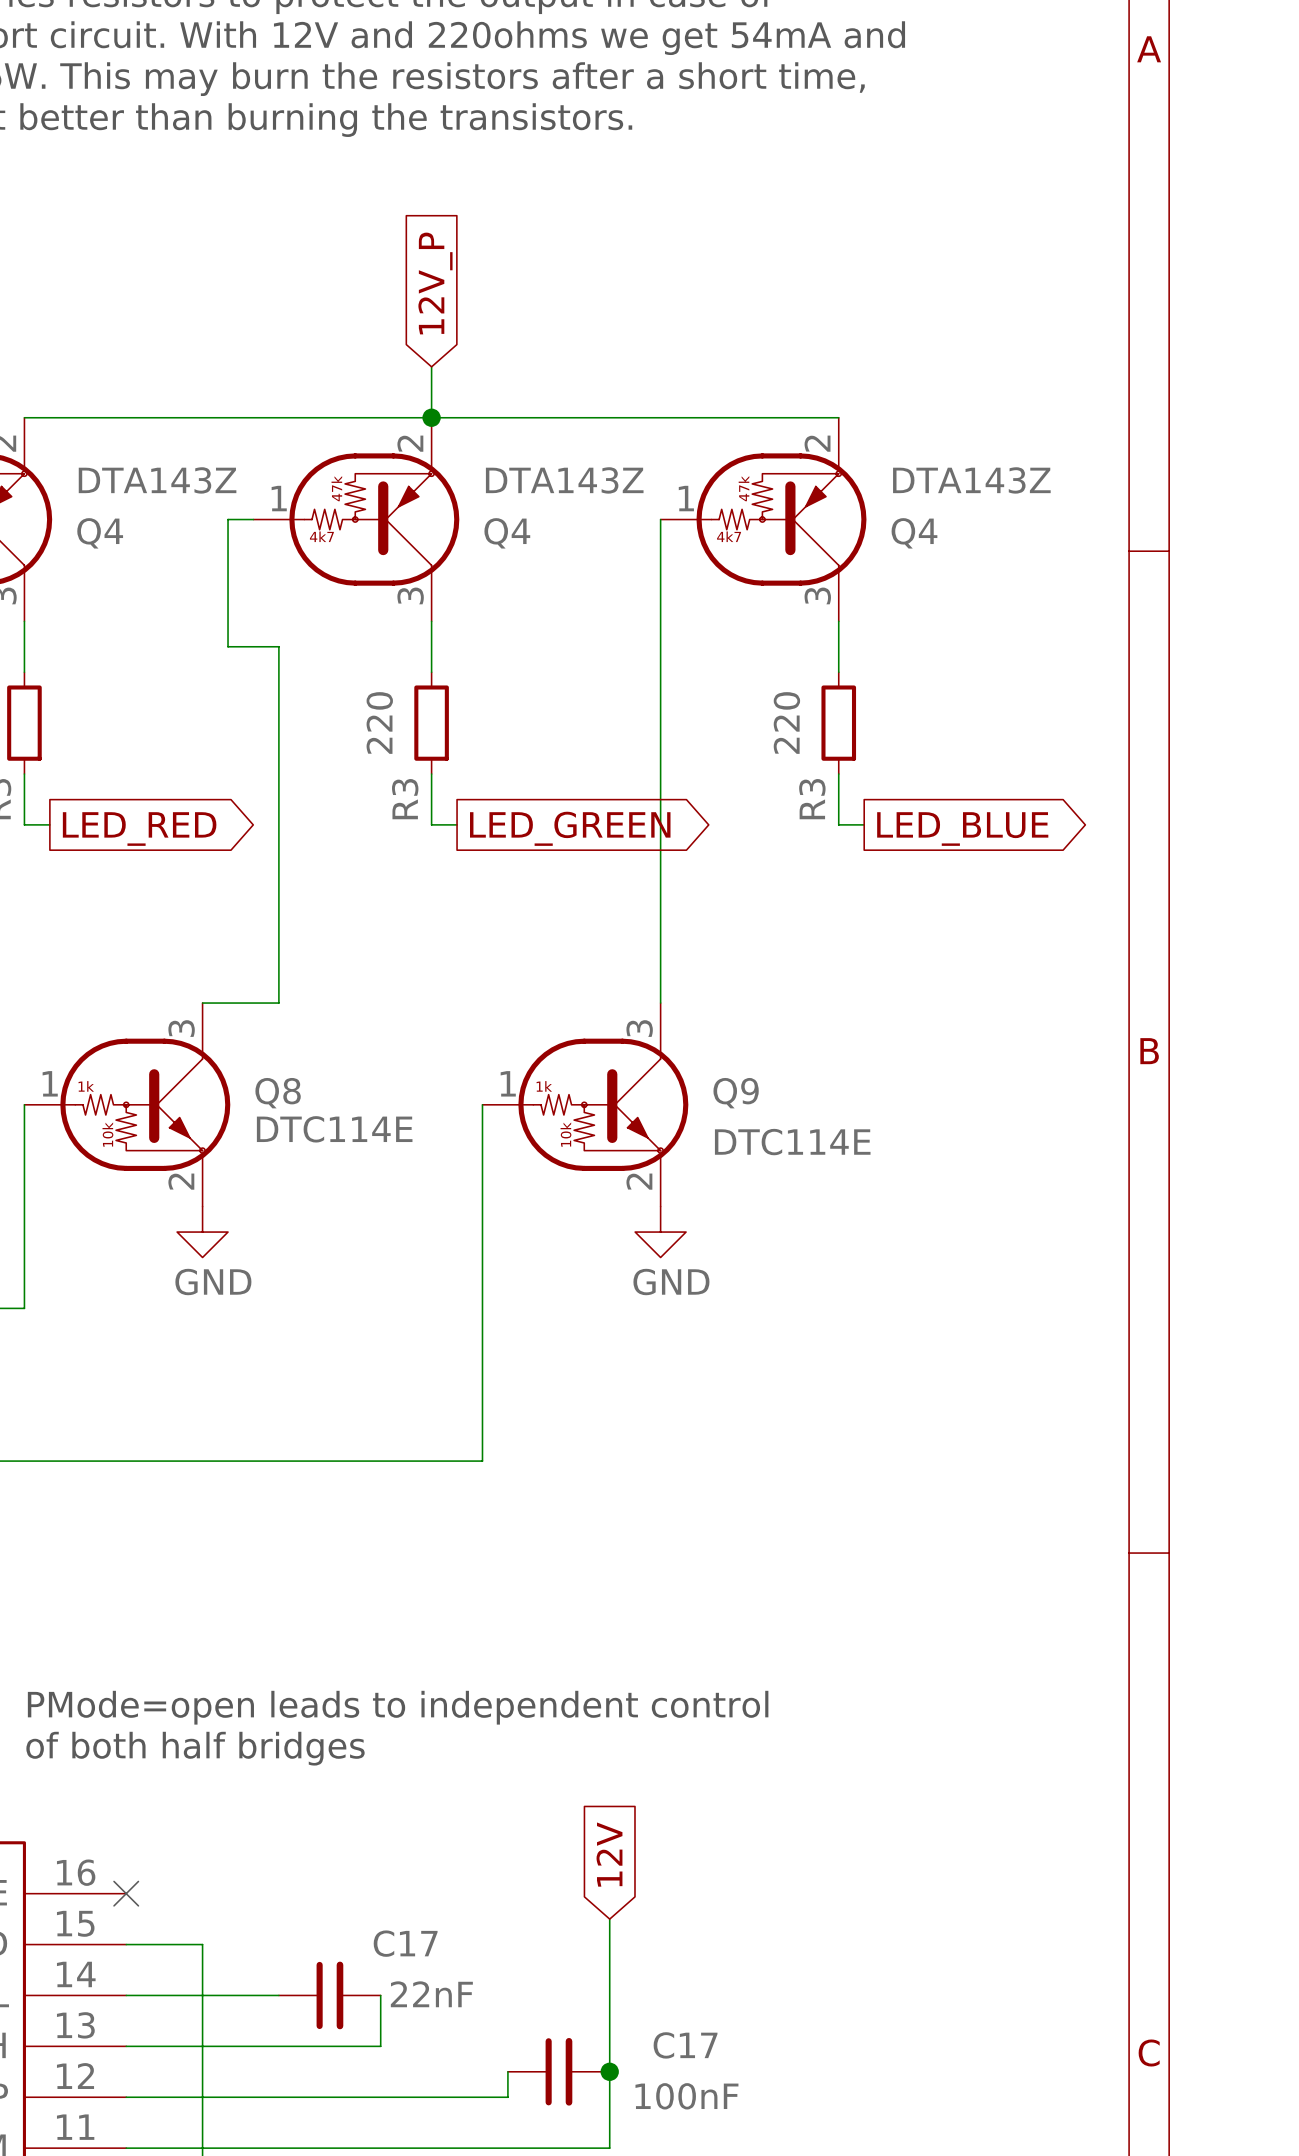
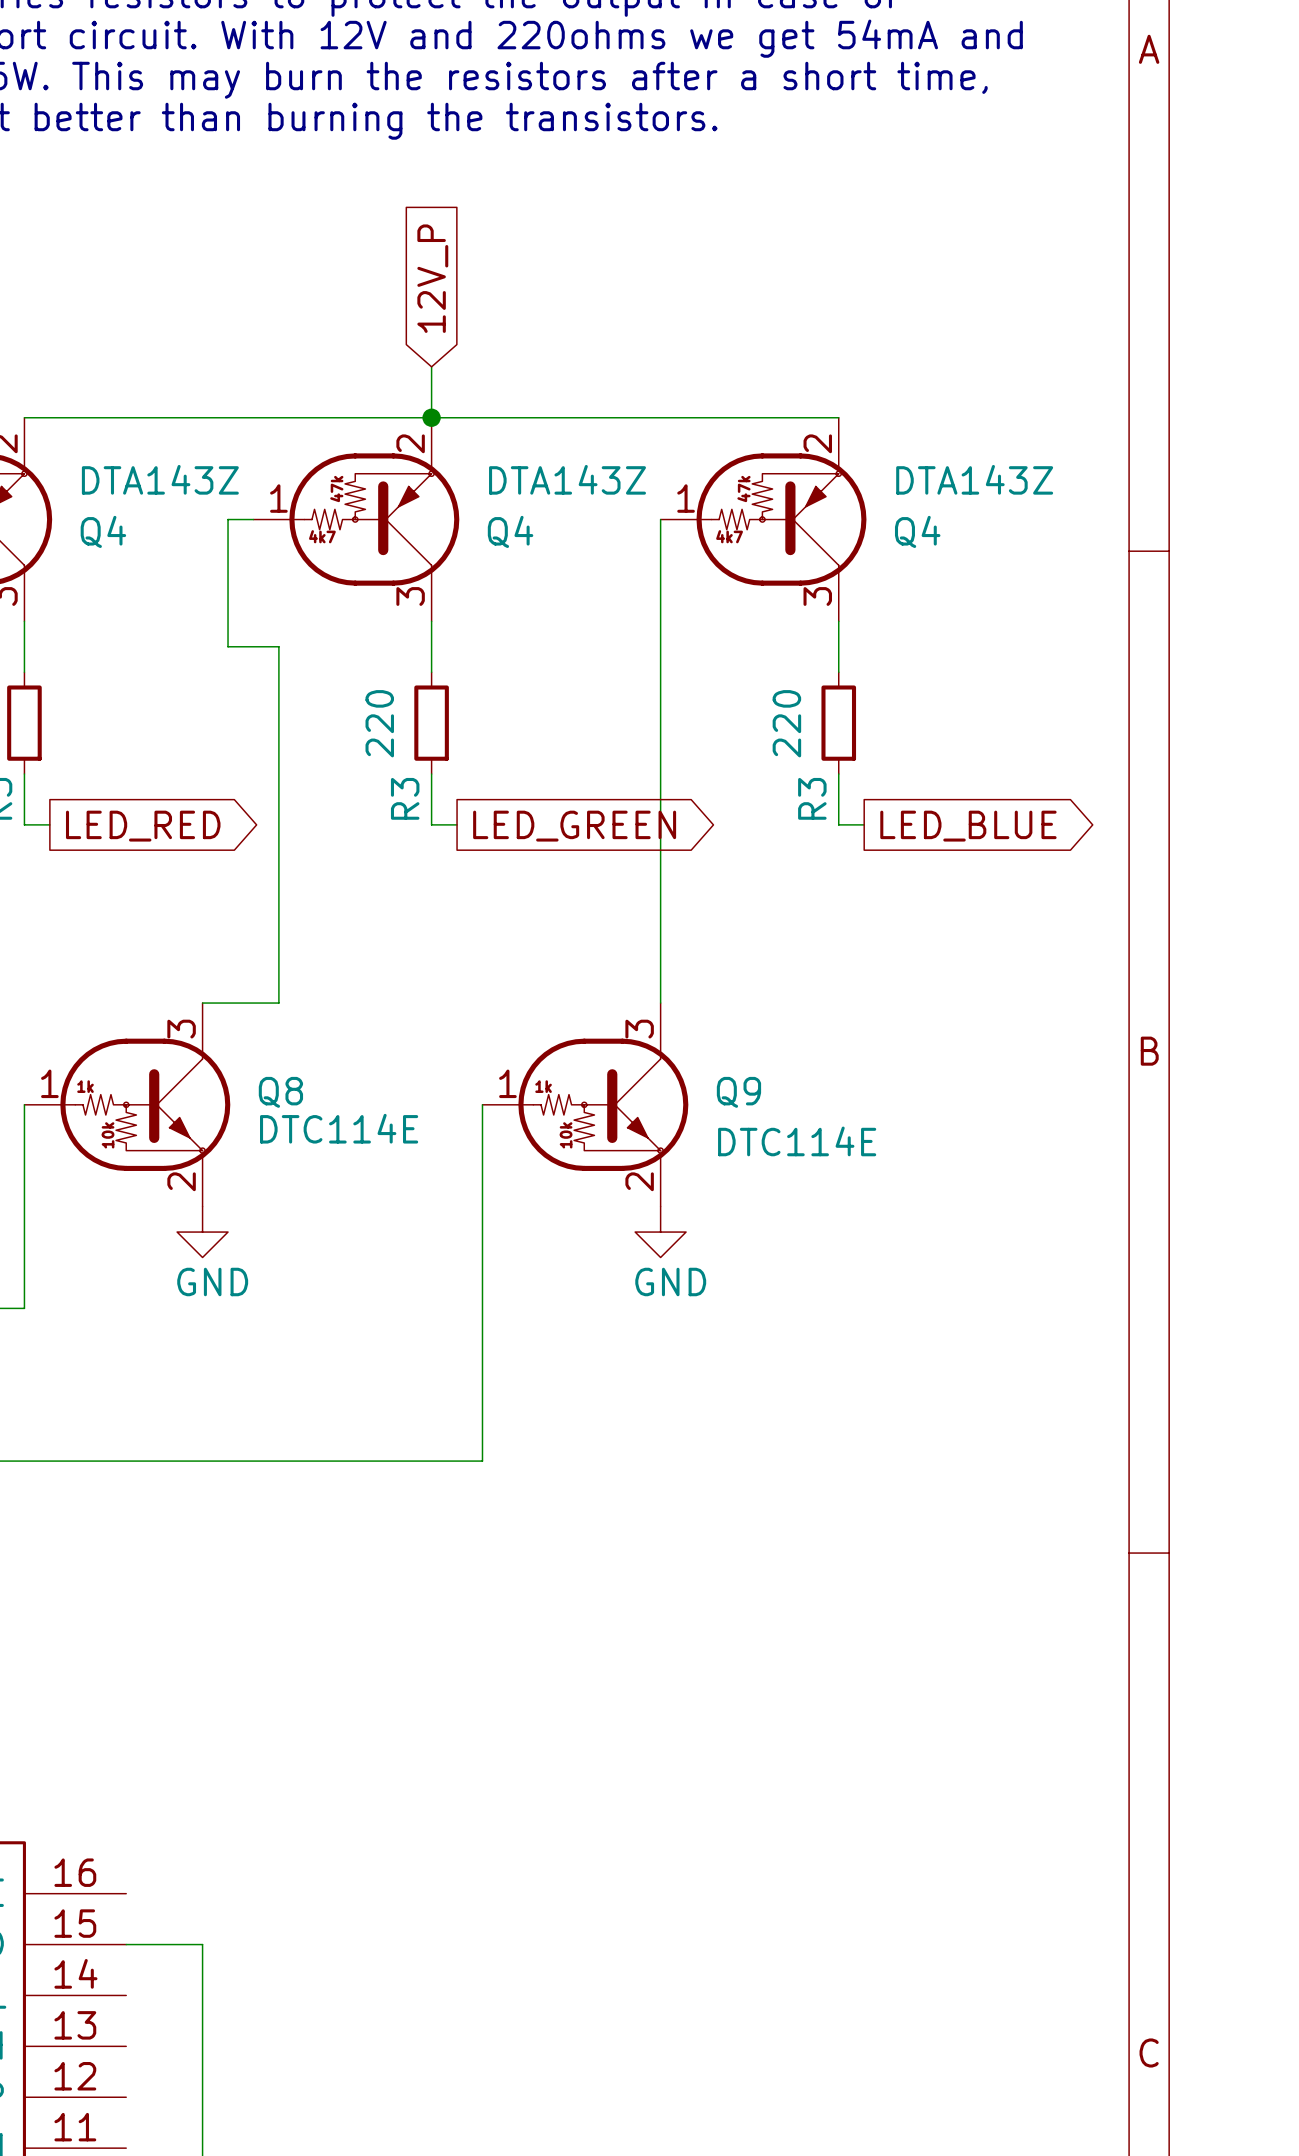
text: PMode=open leads to independent control (398, 1707) -> none
text: of both half bridges (195, 1748) -> none
global label: 12V (609, 1854) -> none
no-connect mark: (126, 1893) -> none
wire: (609, 1919) (609, 2148) (126, 2148) -> none
wire: (126, 1995) (278, 1995) -> none
C17: 22nF (329, 1995) -> none
wire: (380, 1995) (380, 2046) (126, 2046) -> none
wire: (507, 2071) (507, 2097) (126, 2097) -> none
C17: 100nF (558, 2071) -> none
junction: (609, 2071) -> none

